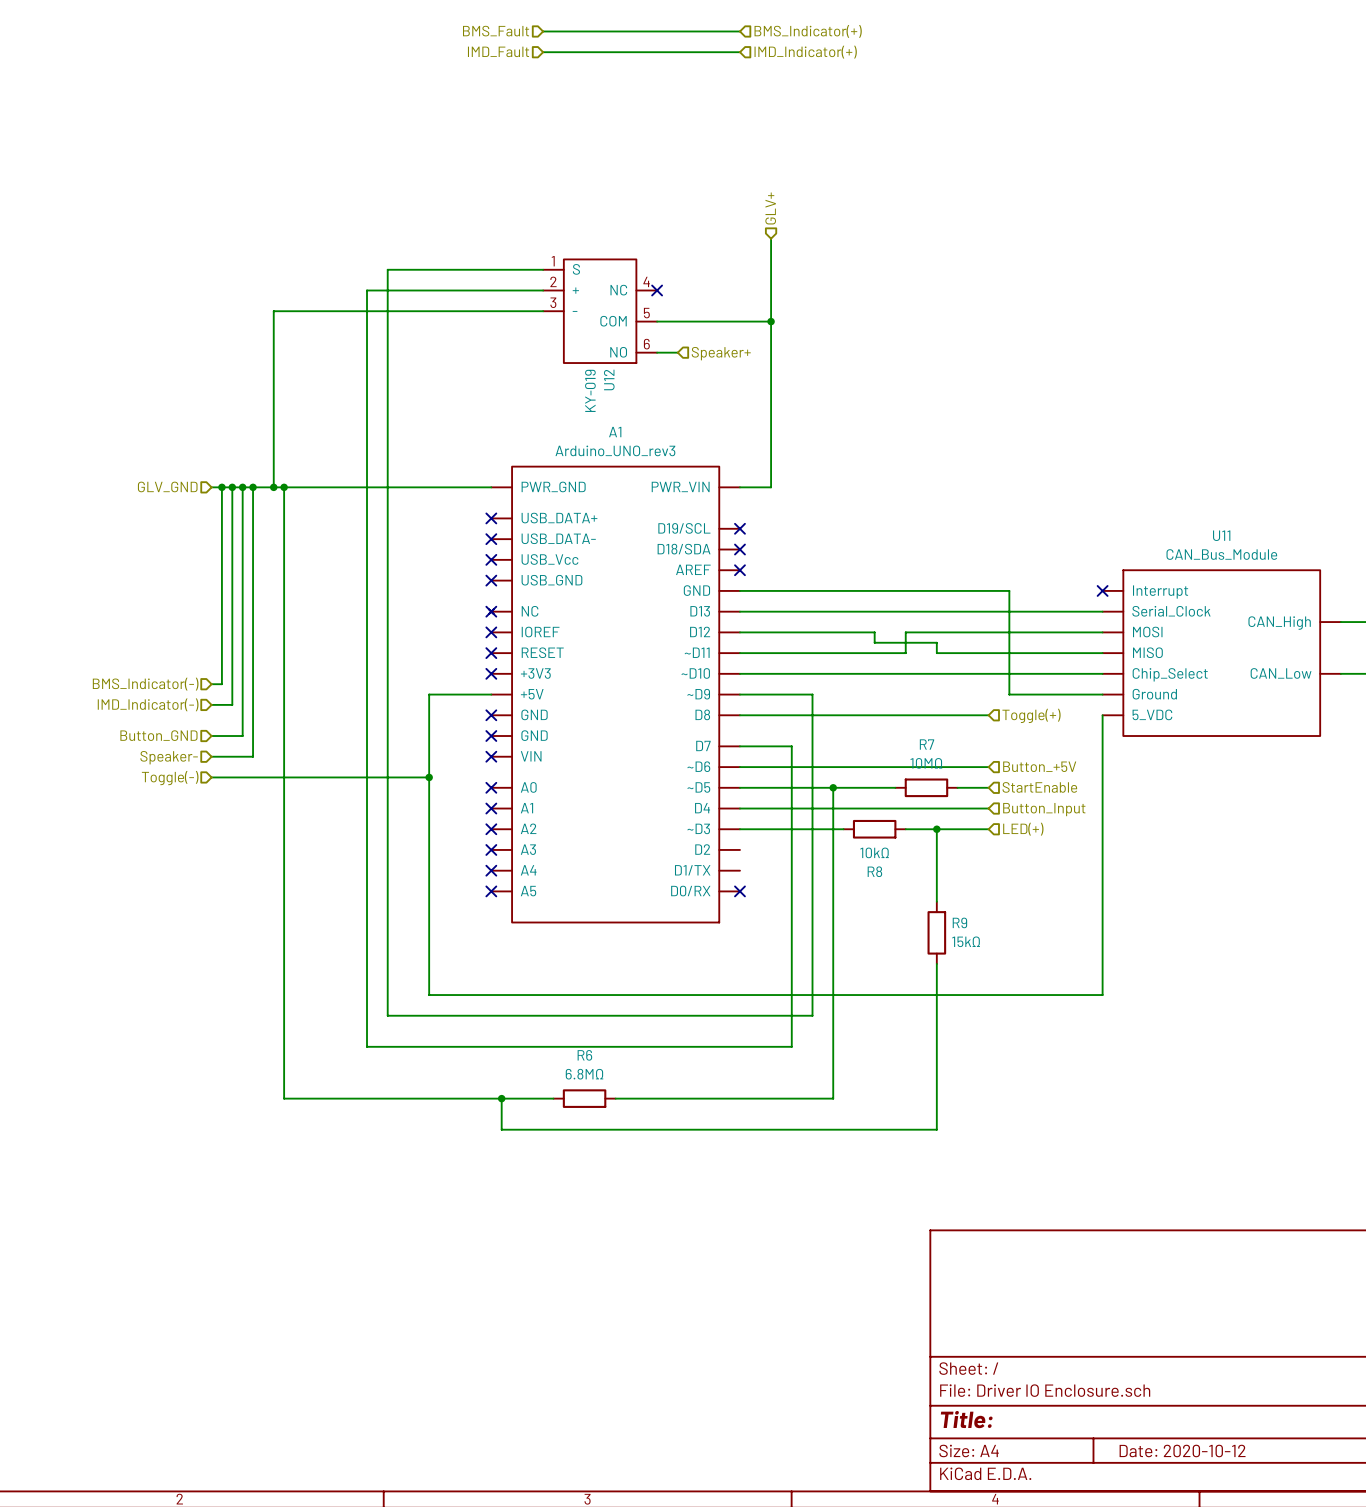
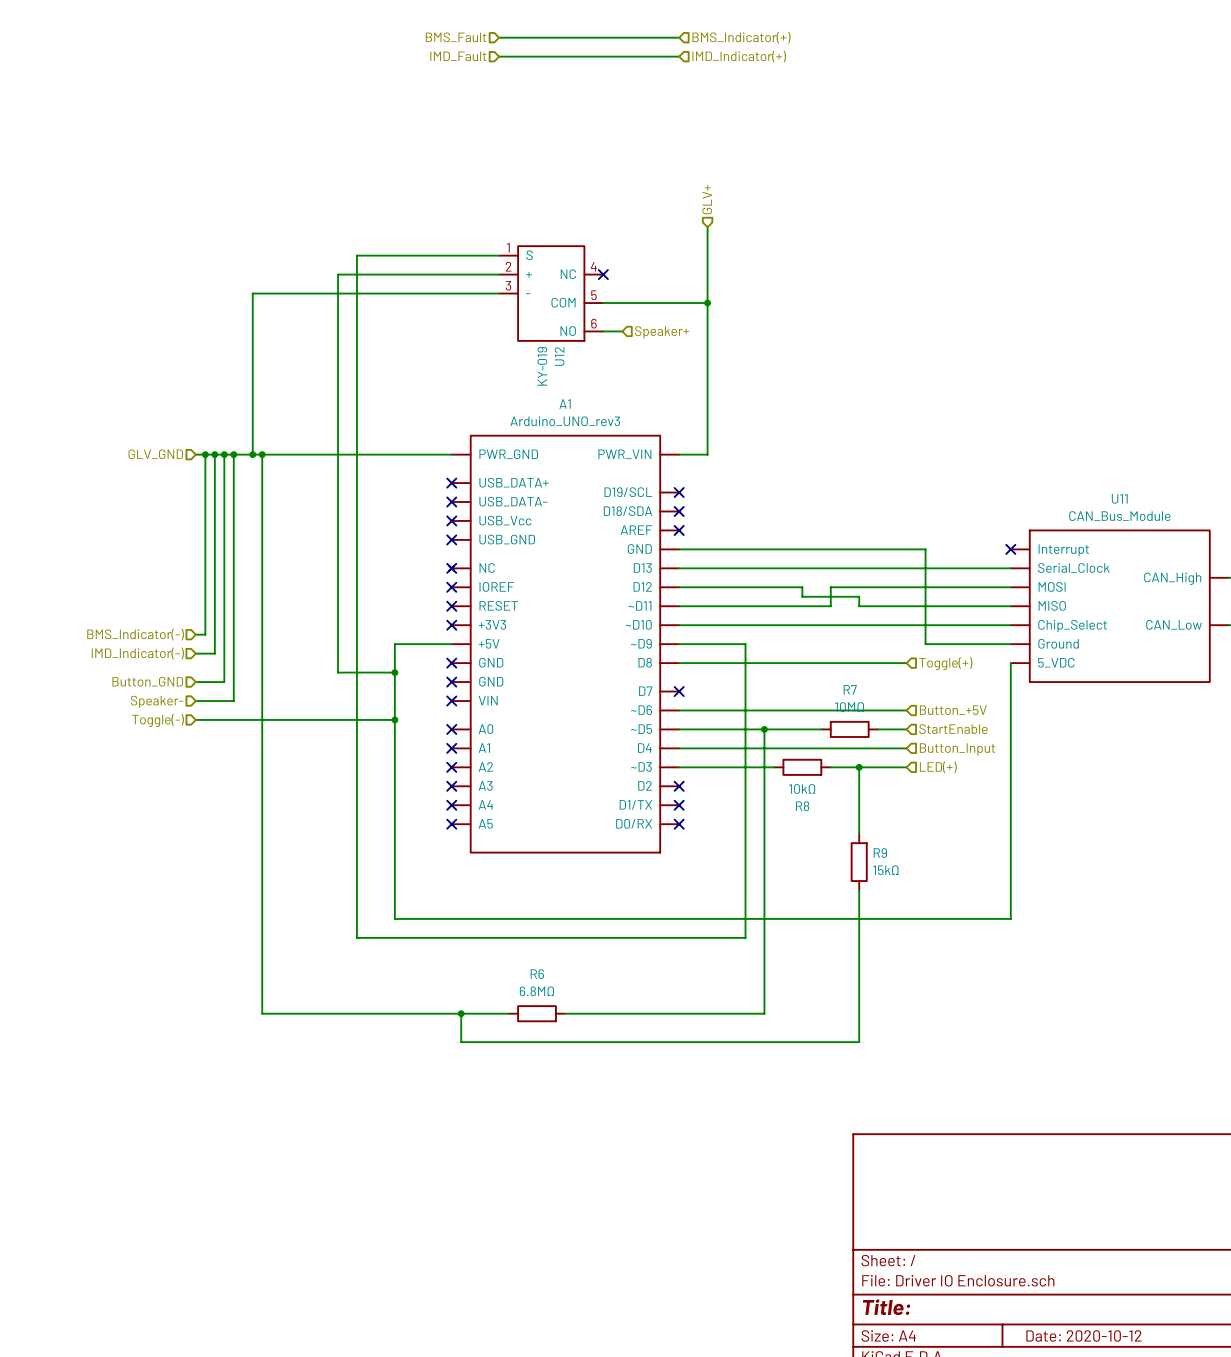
wire: (367, 725) (367, 1046) (791, 1046) (791, 746) (739, 746) -> (338, 672) (394, 672)
junction: none -> (394, 672)
no-connect mark: none -> (679, 691)
no-connect mark: none -> (679, 786)
no-connect mark: none -> (679, 805)

